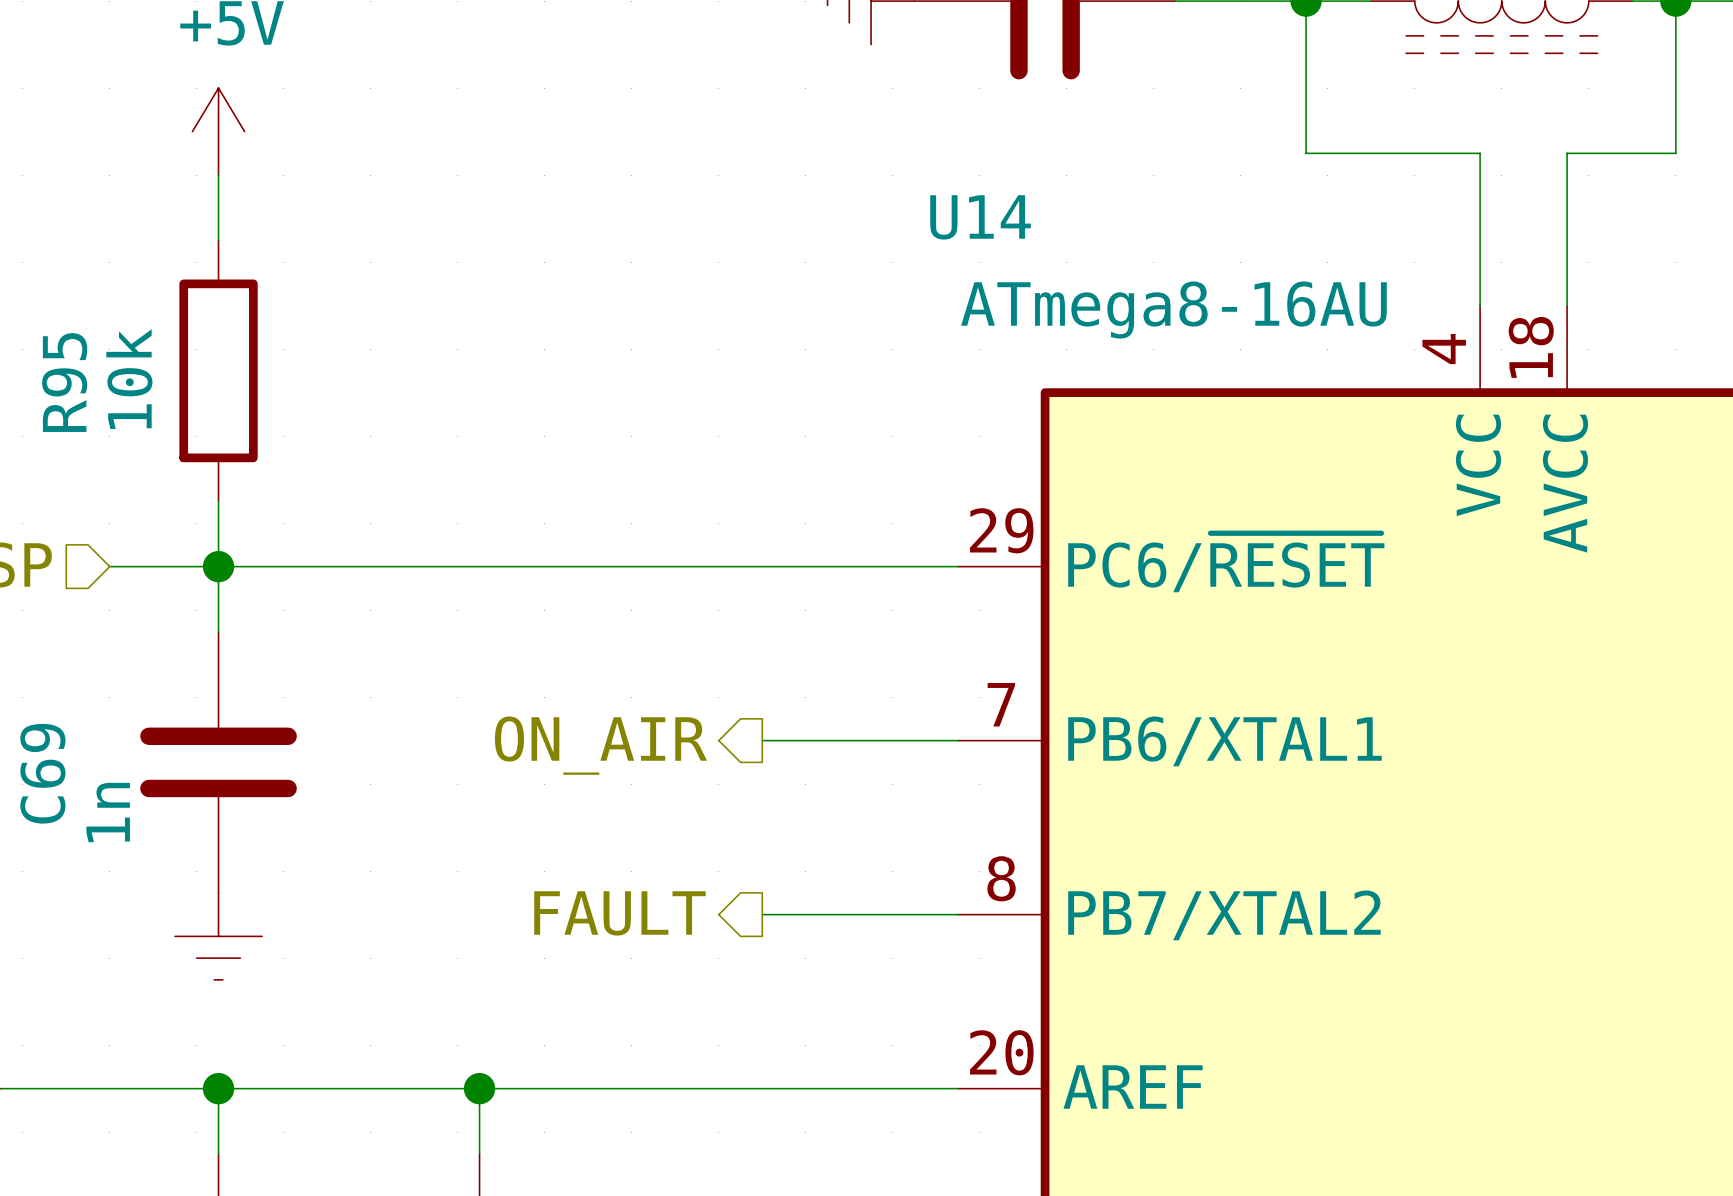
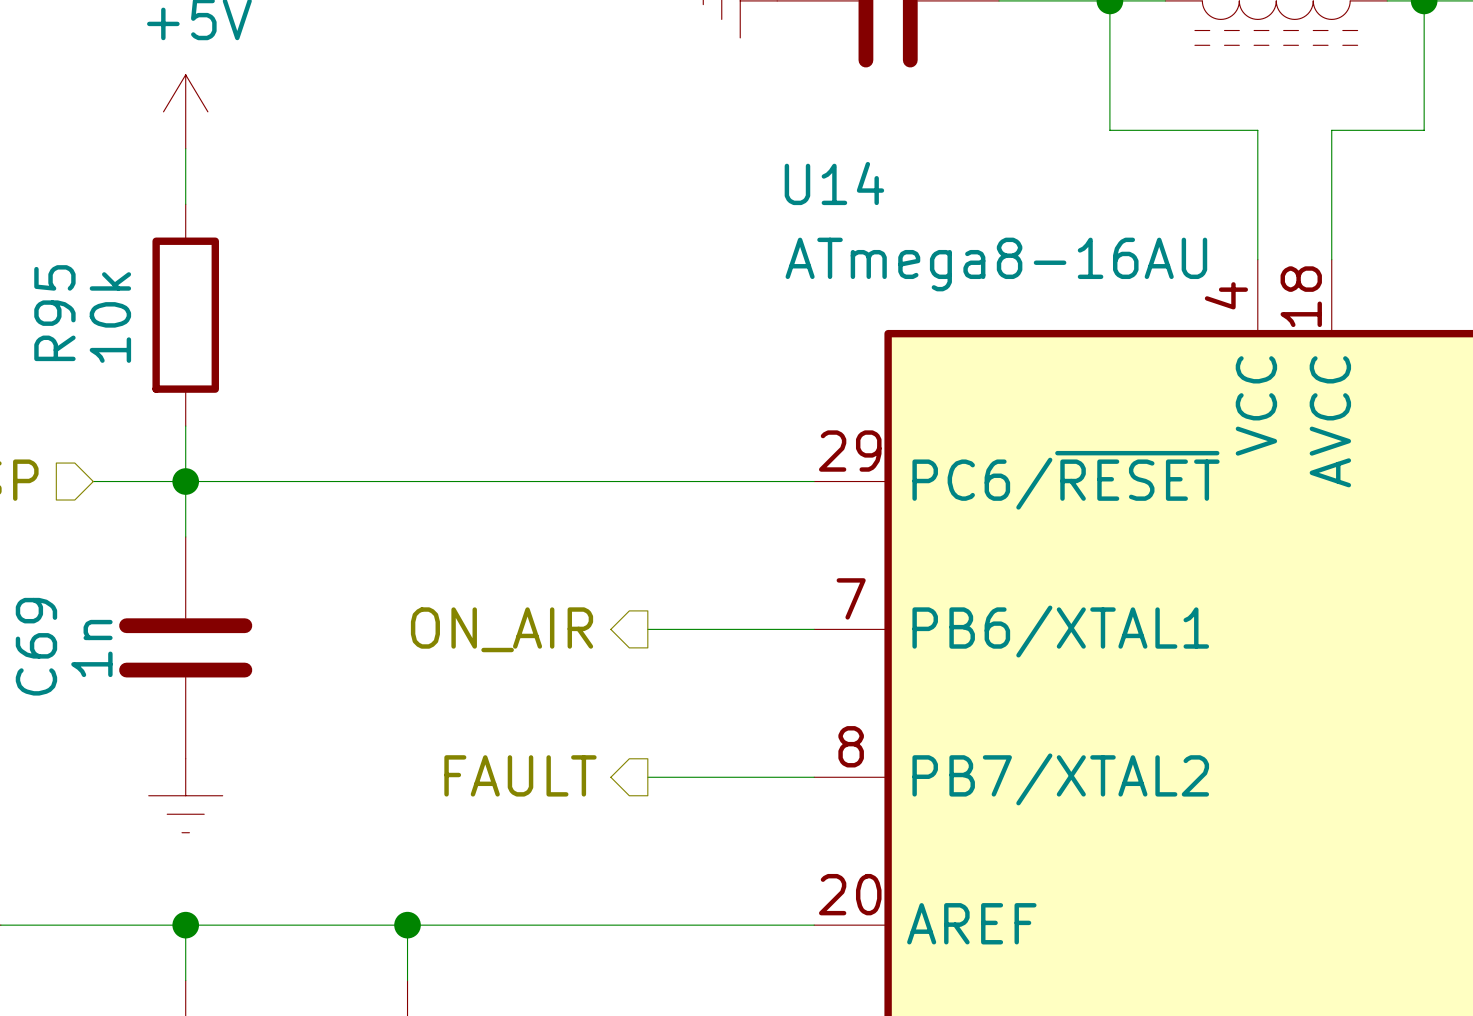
C69 value position: 1n (108, 812) -> 1n (91, 648)

